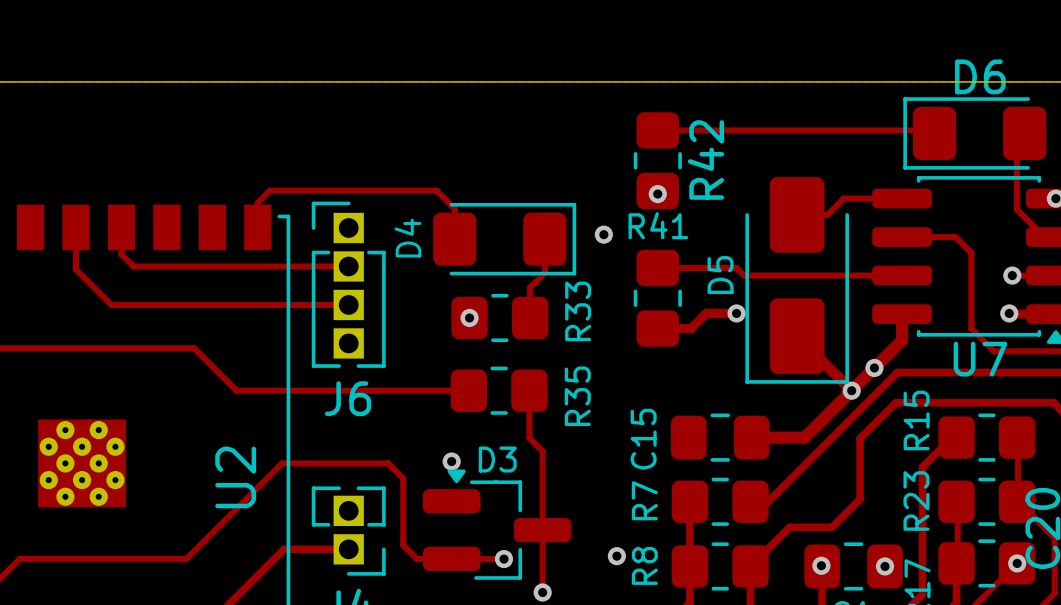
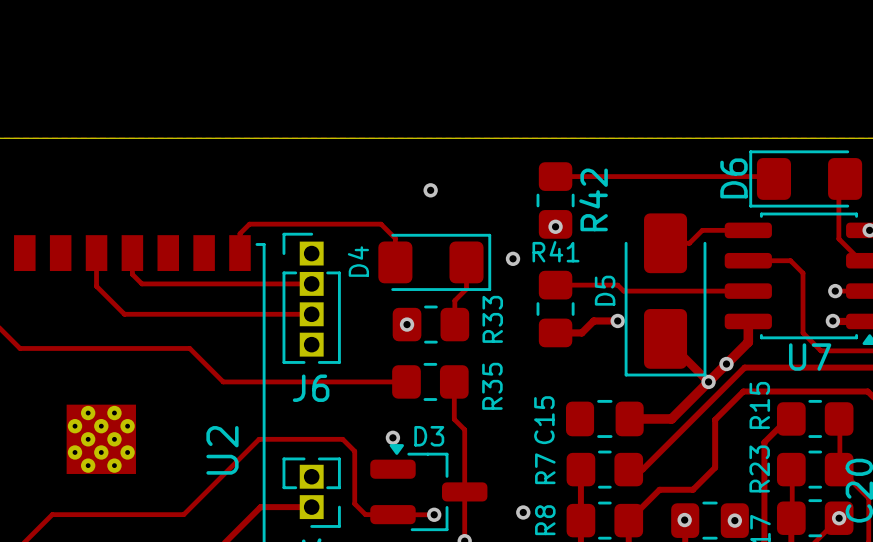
D6 name rotation: 0° (980, 76) -> 90° counterclockwise (733, 178)
D6 name position: D6 (980, 76) -> D6 (733, 178)
via: none -> (430, 190)

